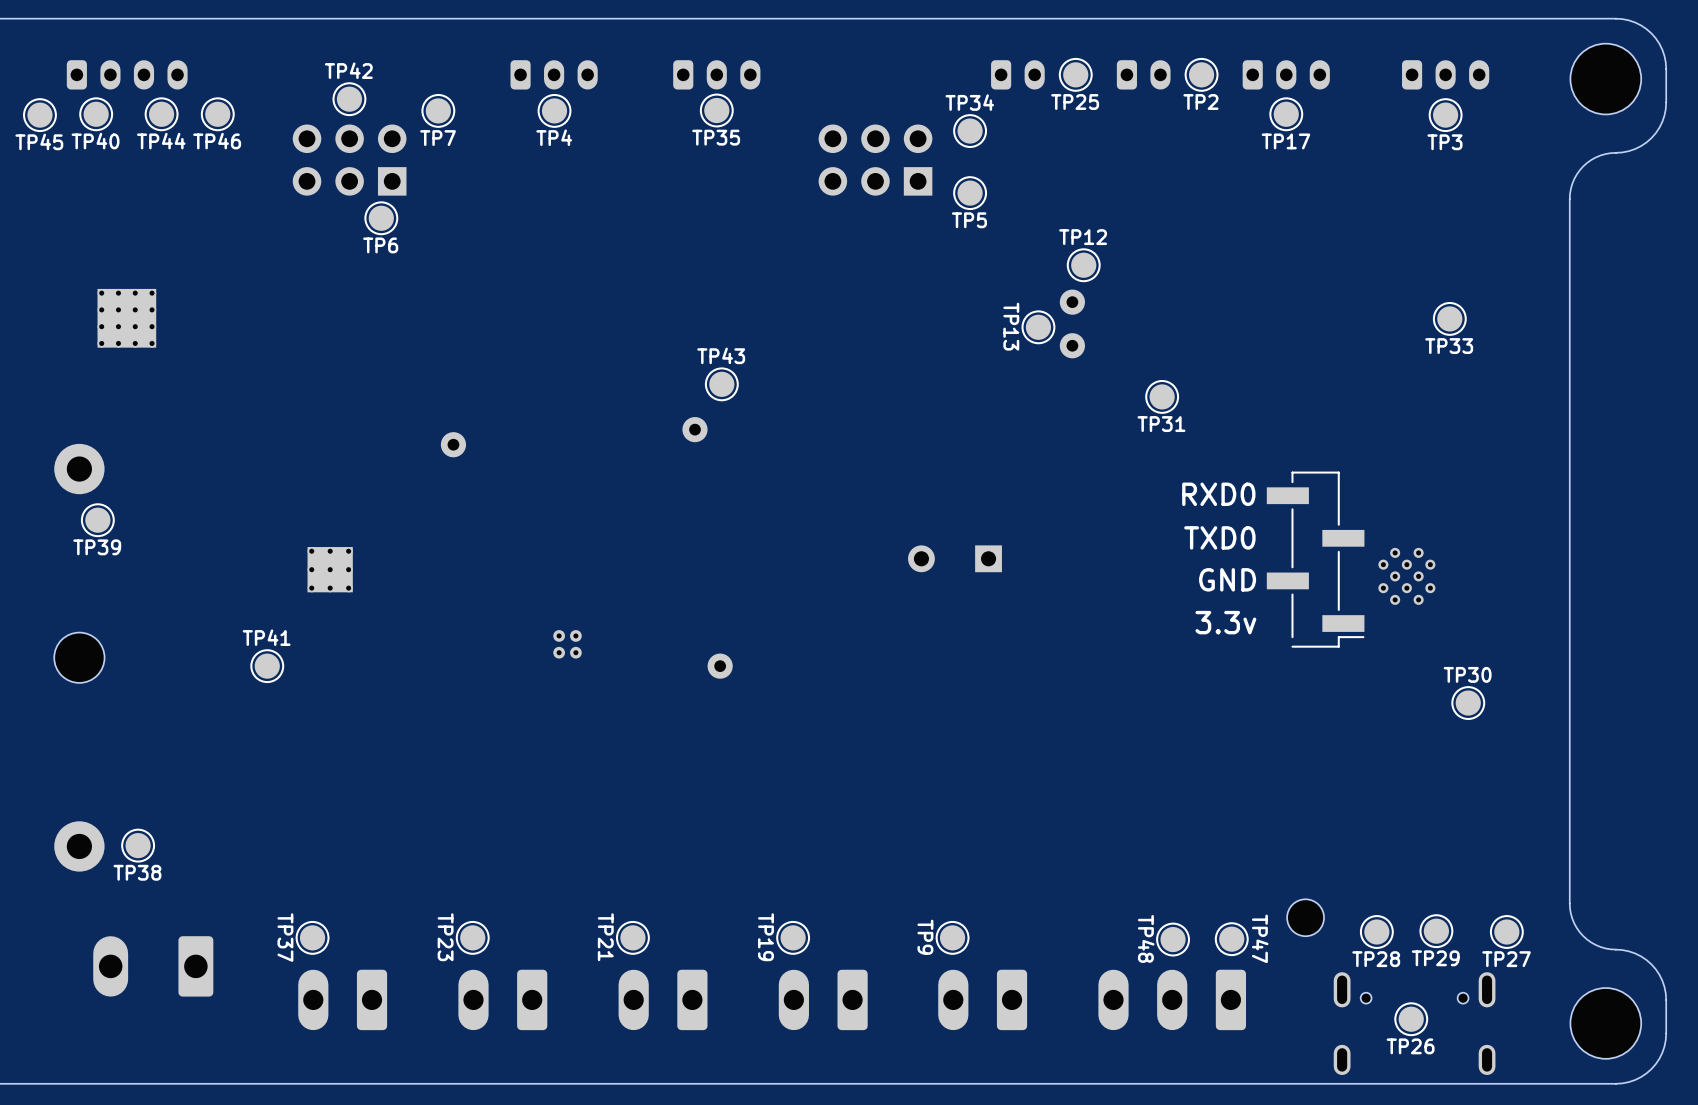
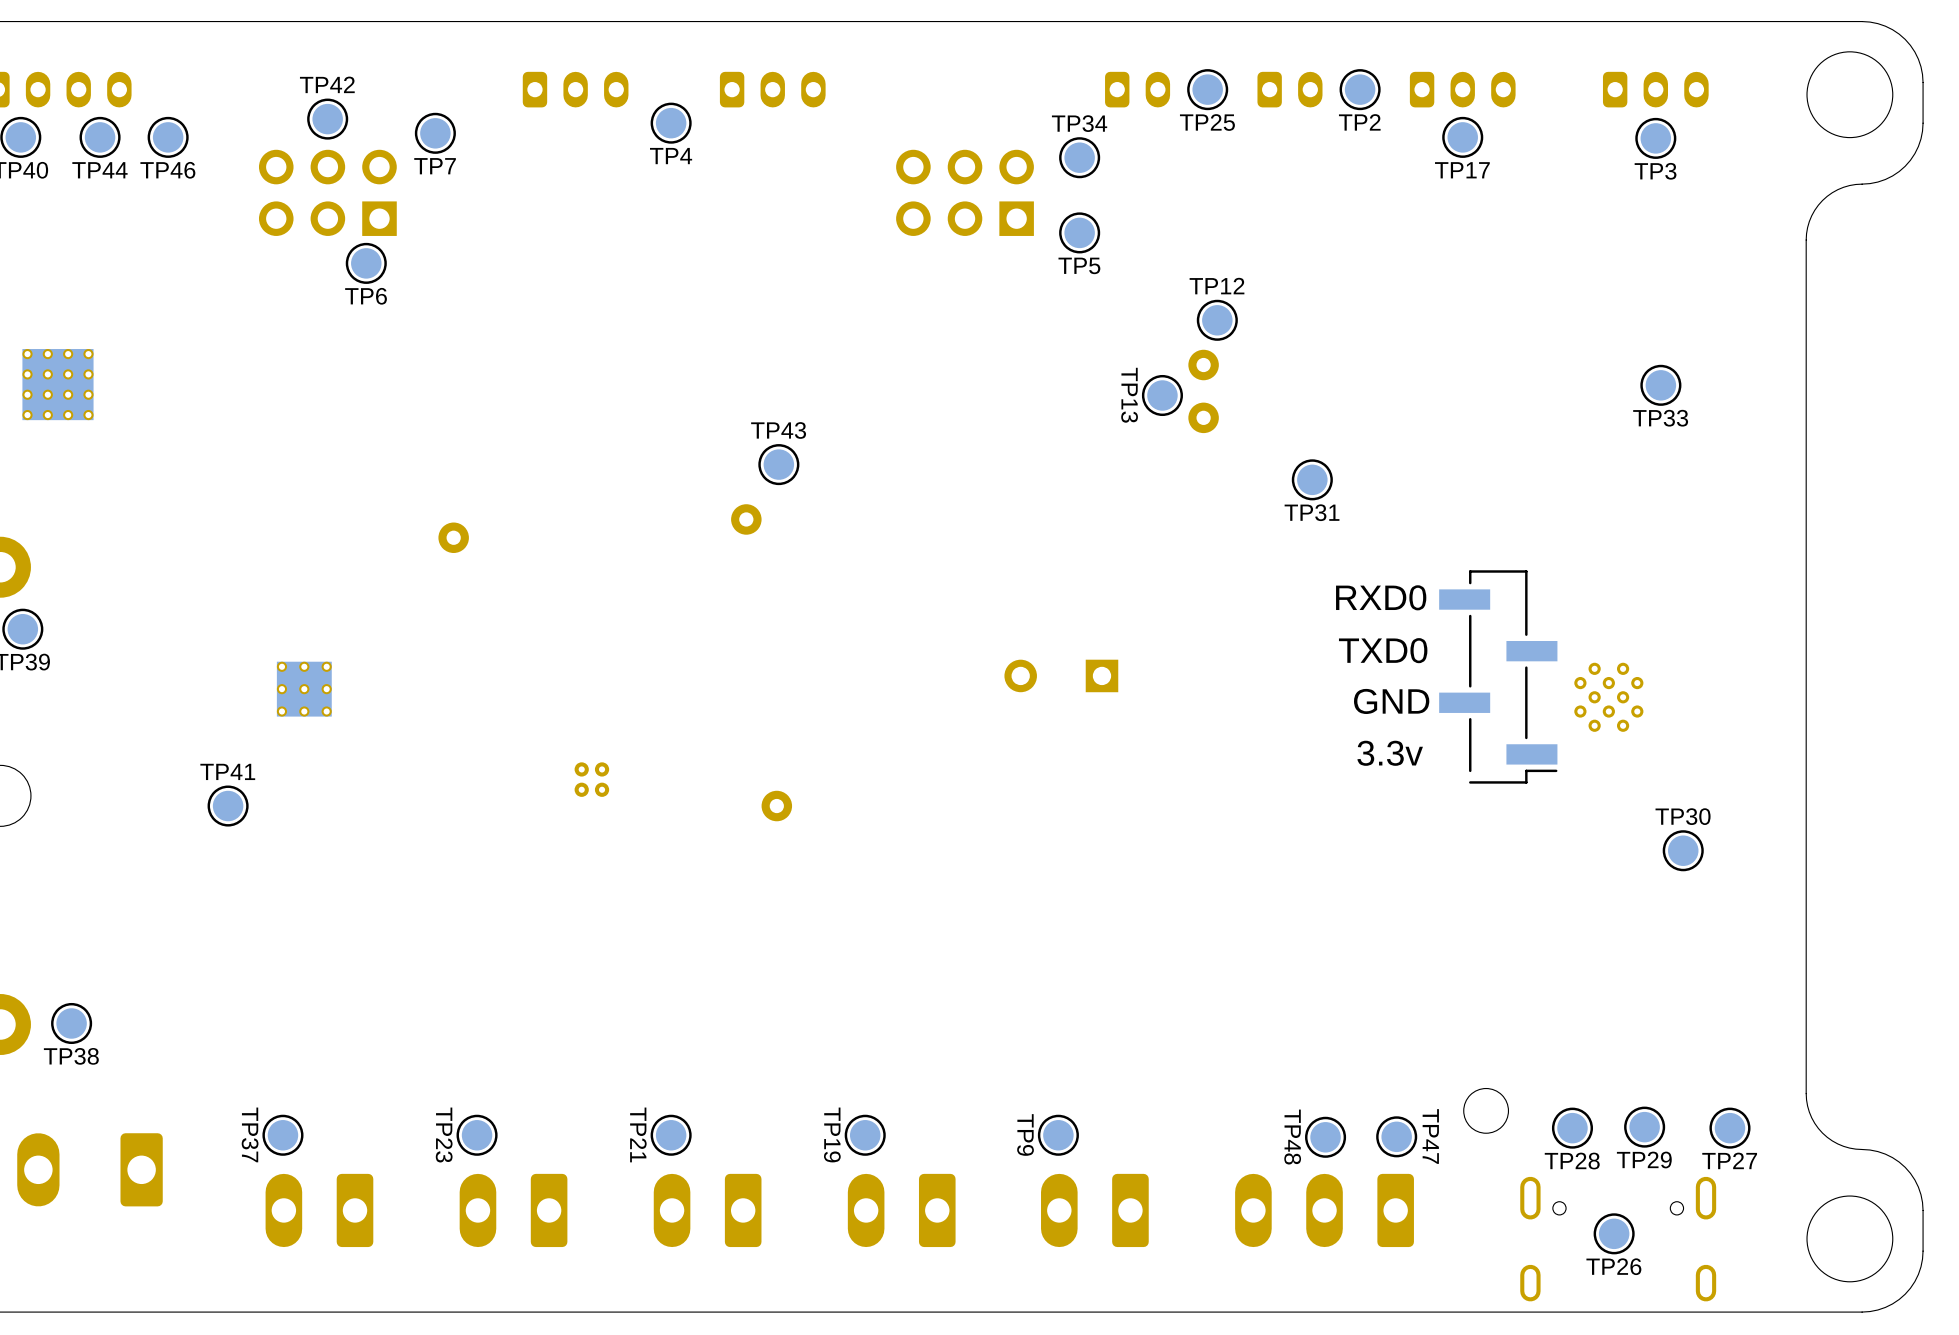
TP4 position: (554, 110) -> (671, 123)
TP35: (716, 110) -> none

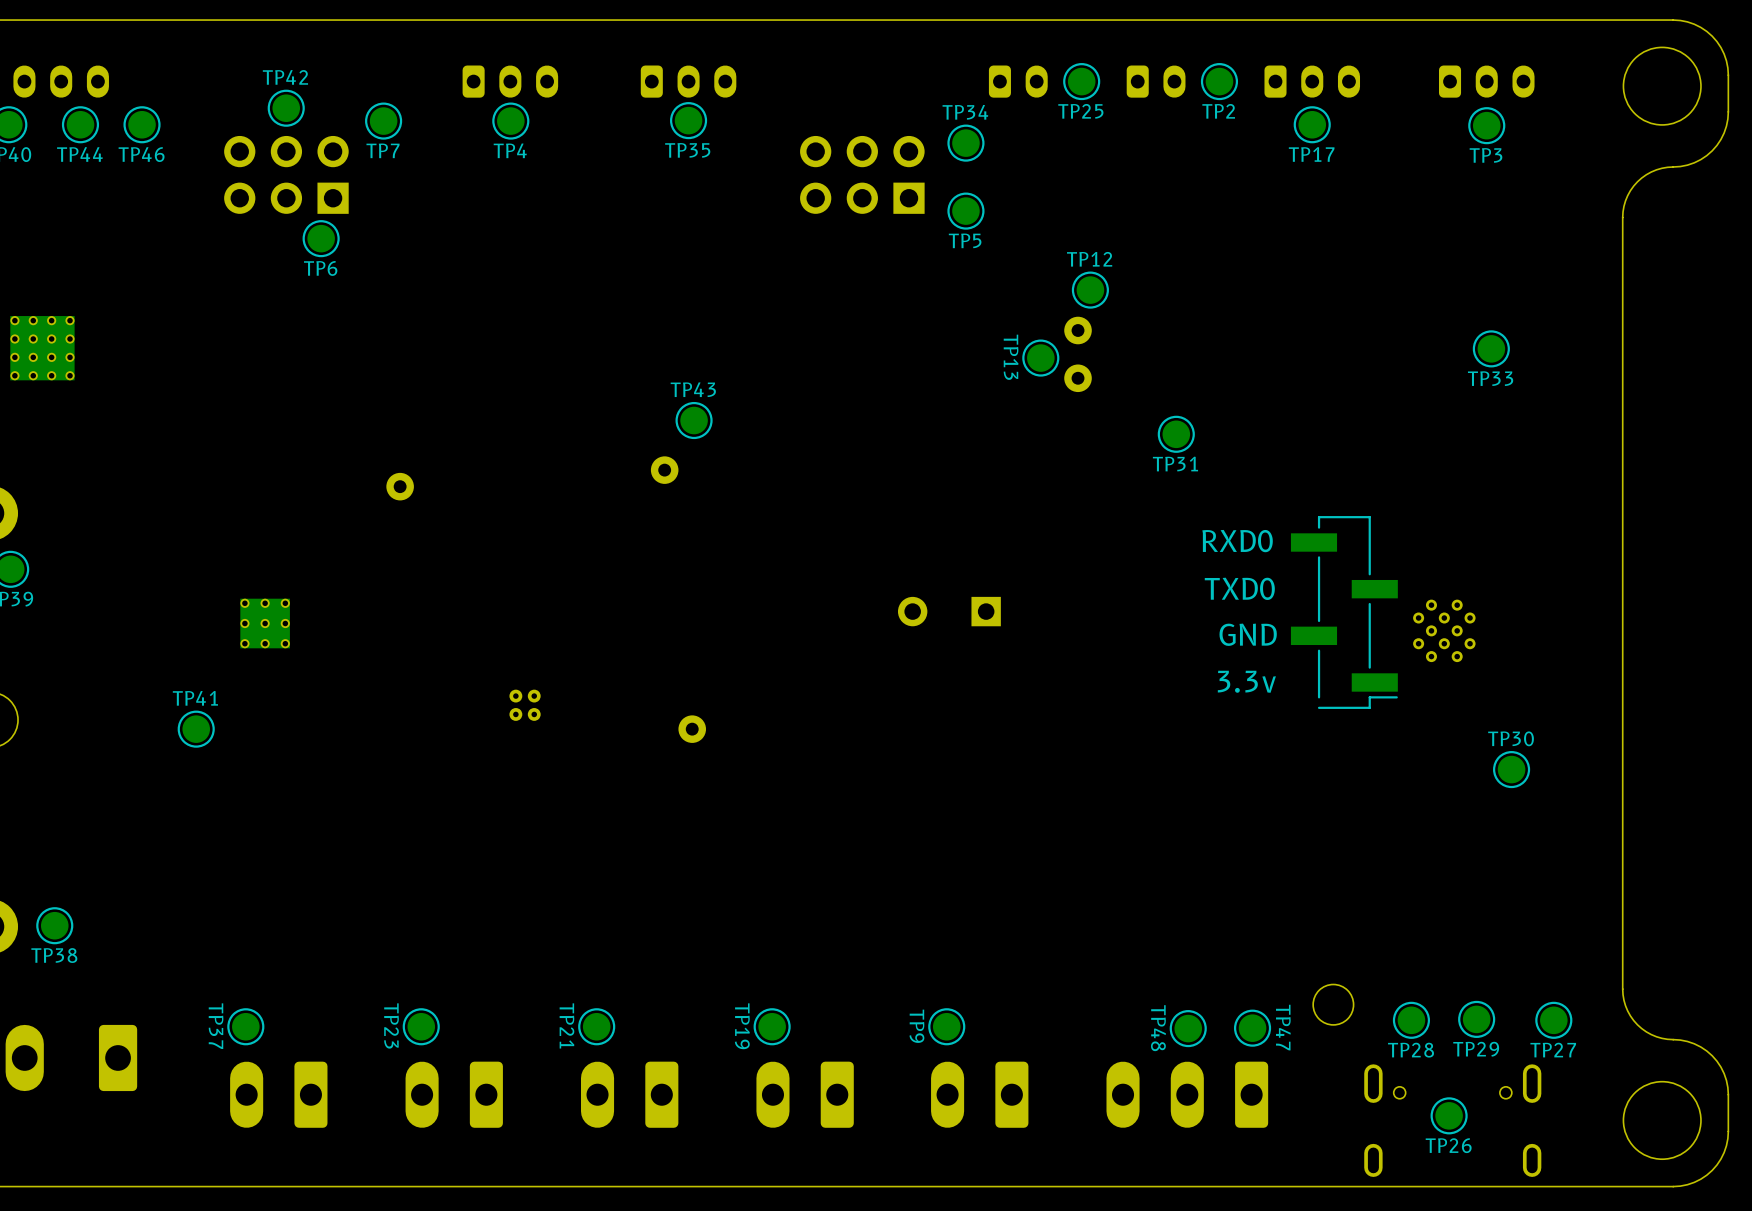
TP4 position: (671, 123) -> (510, 121)
TP35: none -> (688, 120)

